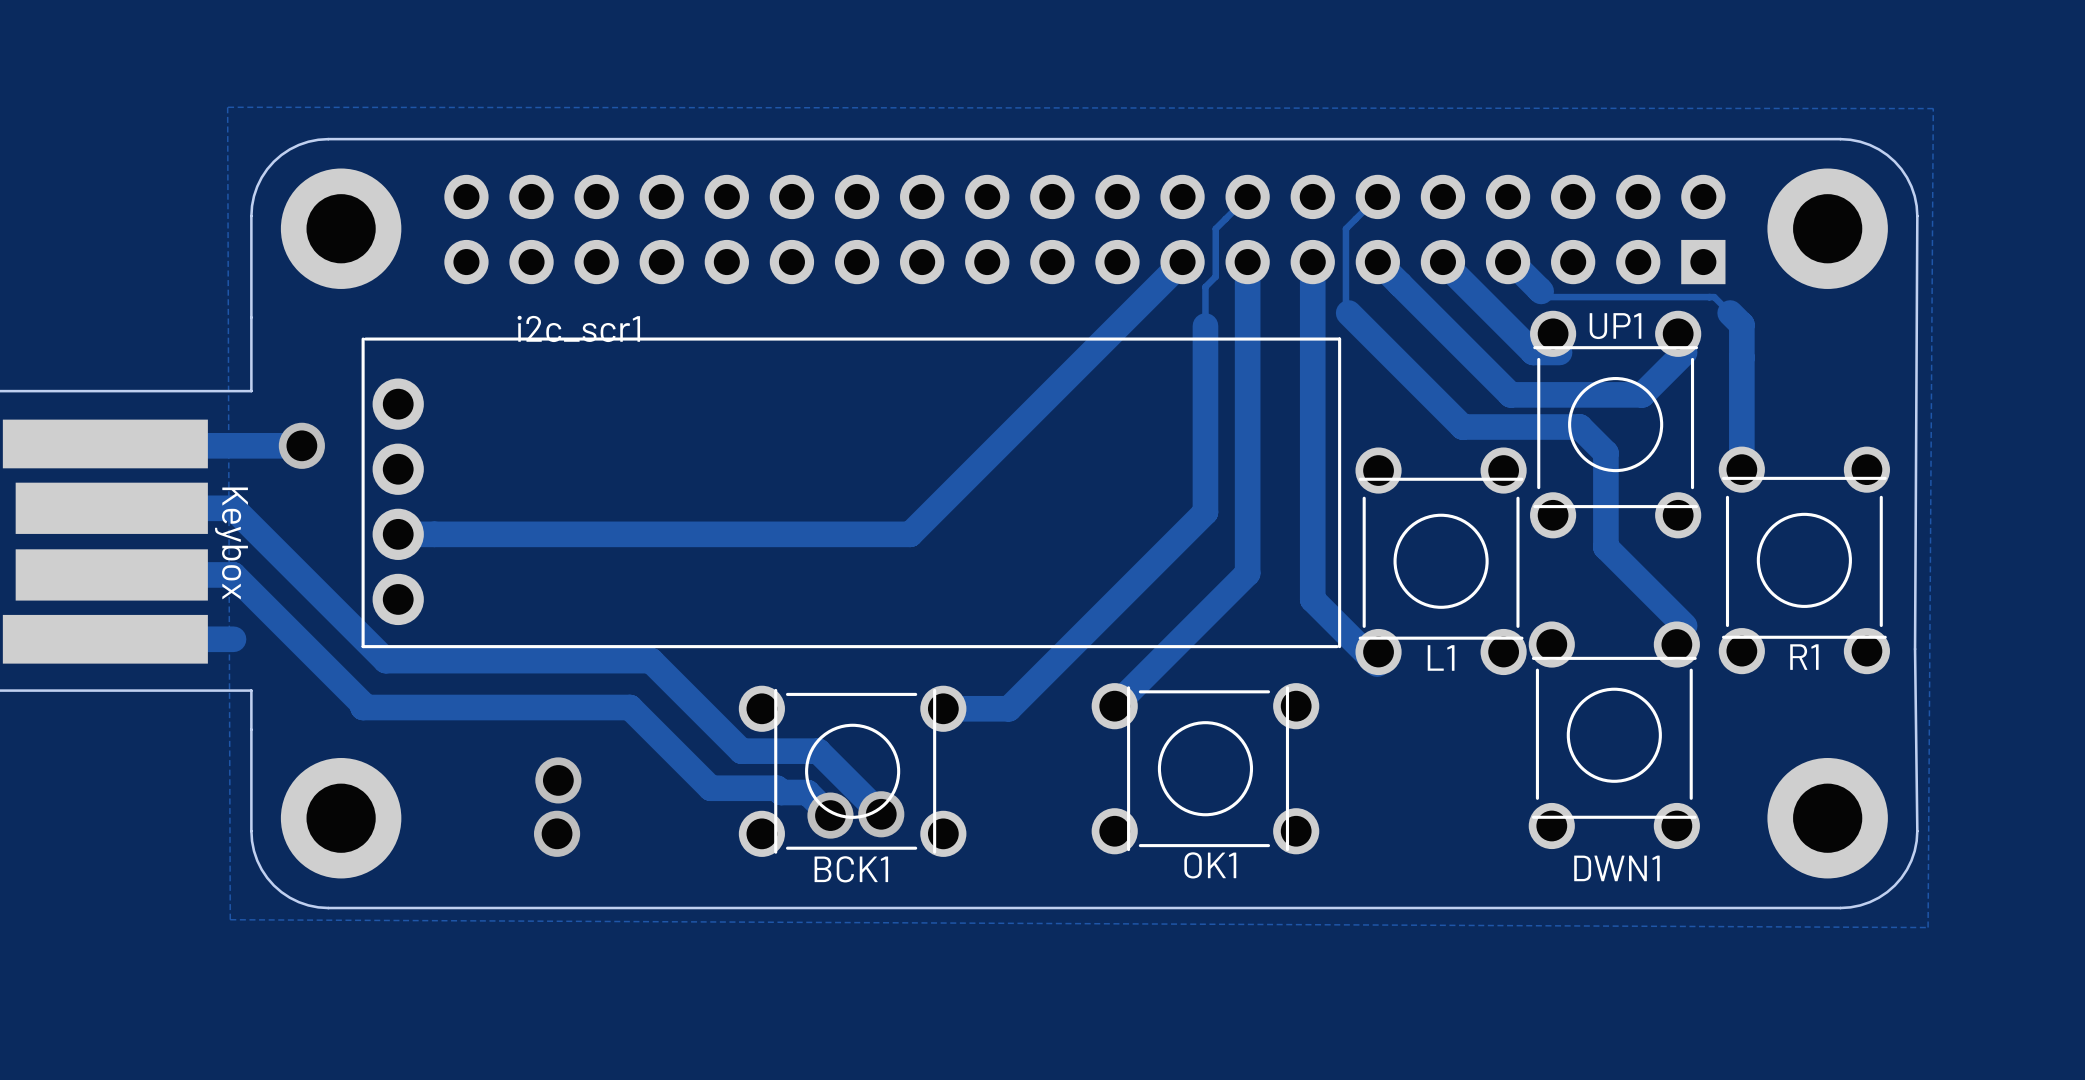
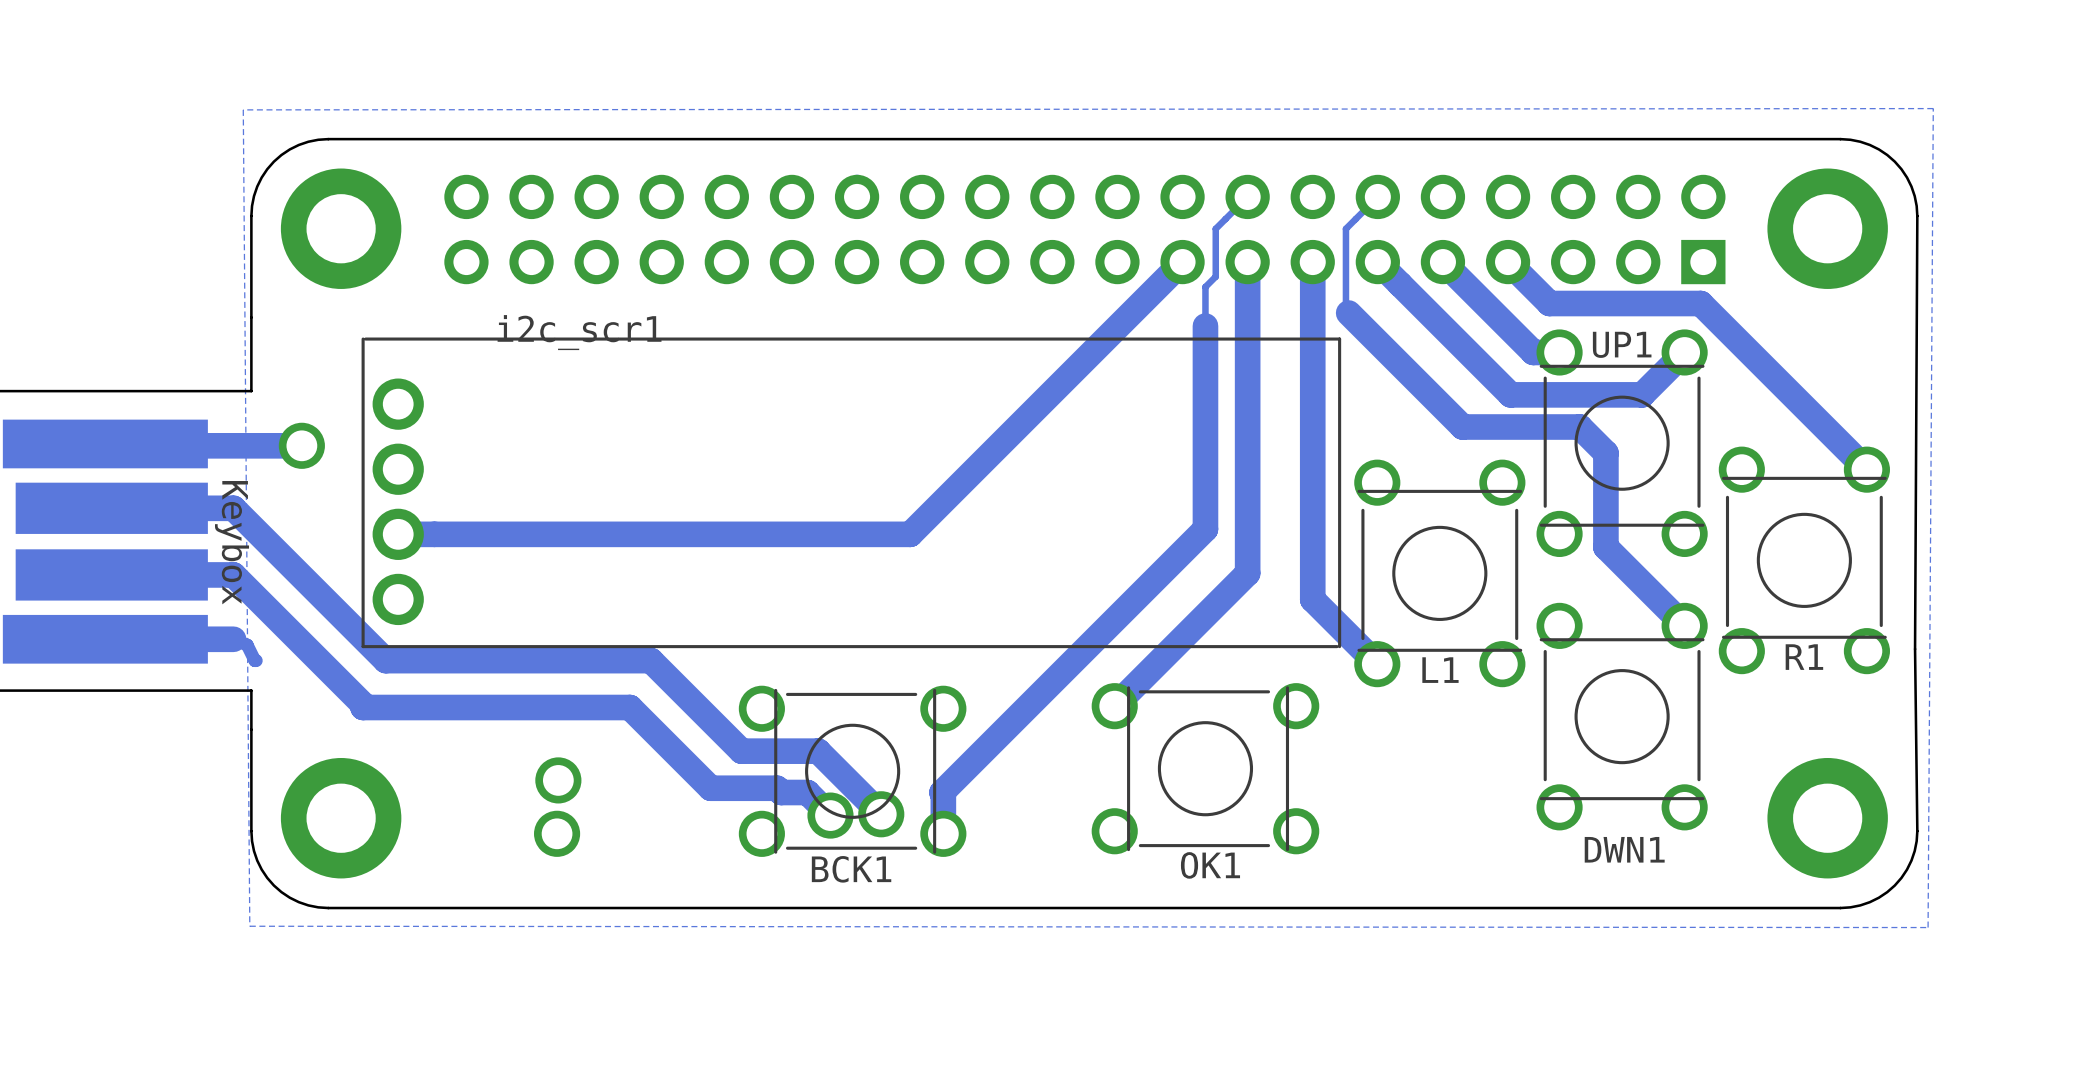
zone outline: (1933, 108) (227, 107) (230, 919) (1928, 927) -> (1933, 108) (243, 109) (249, 926) (1928, 927)
track: (1508, 262) (1511, 262) (1541, 291) -> (1508, 262) (1549, 303) (1700, 303) (1866, 469)
track: (1539, 289) (1546, 297) (1714, 297) (1741, 324) (1741, 469) -> none
UP1 position: (1615, 424) -> (1622, 443)
track: (1205, 512) (1008, 708) (943, 708) -> (1205, 512) (1205, 529) (942, 792) (943, 833)
L1 position: (1441, 561) -> (1439, 573)
track: none -> (233, 639) (247, 645) (256, 660)
DWN1 position: (1614, 735) -> (1622, 716)

